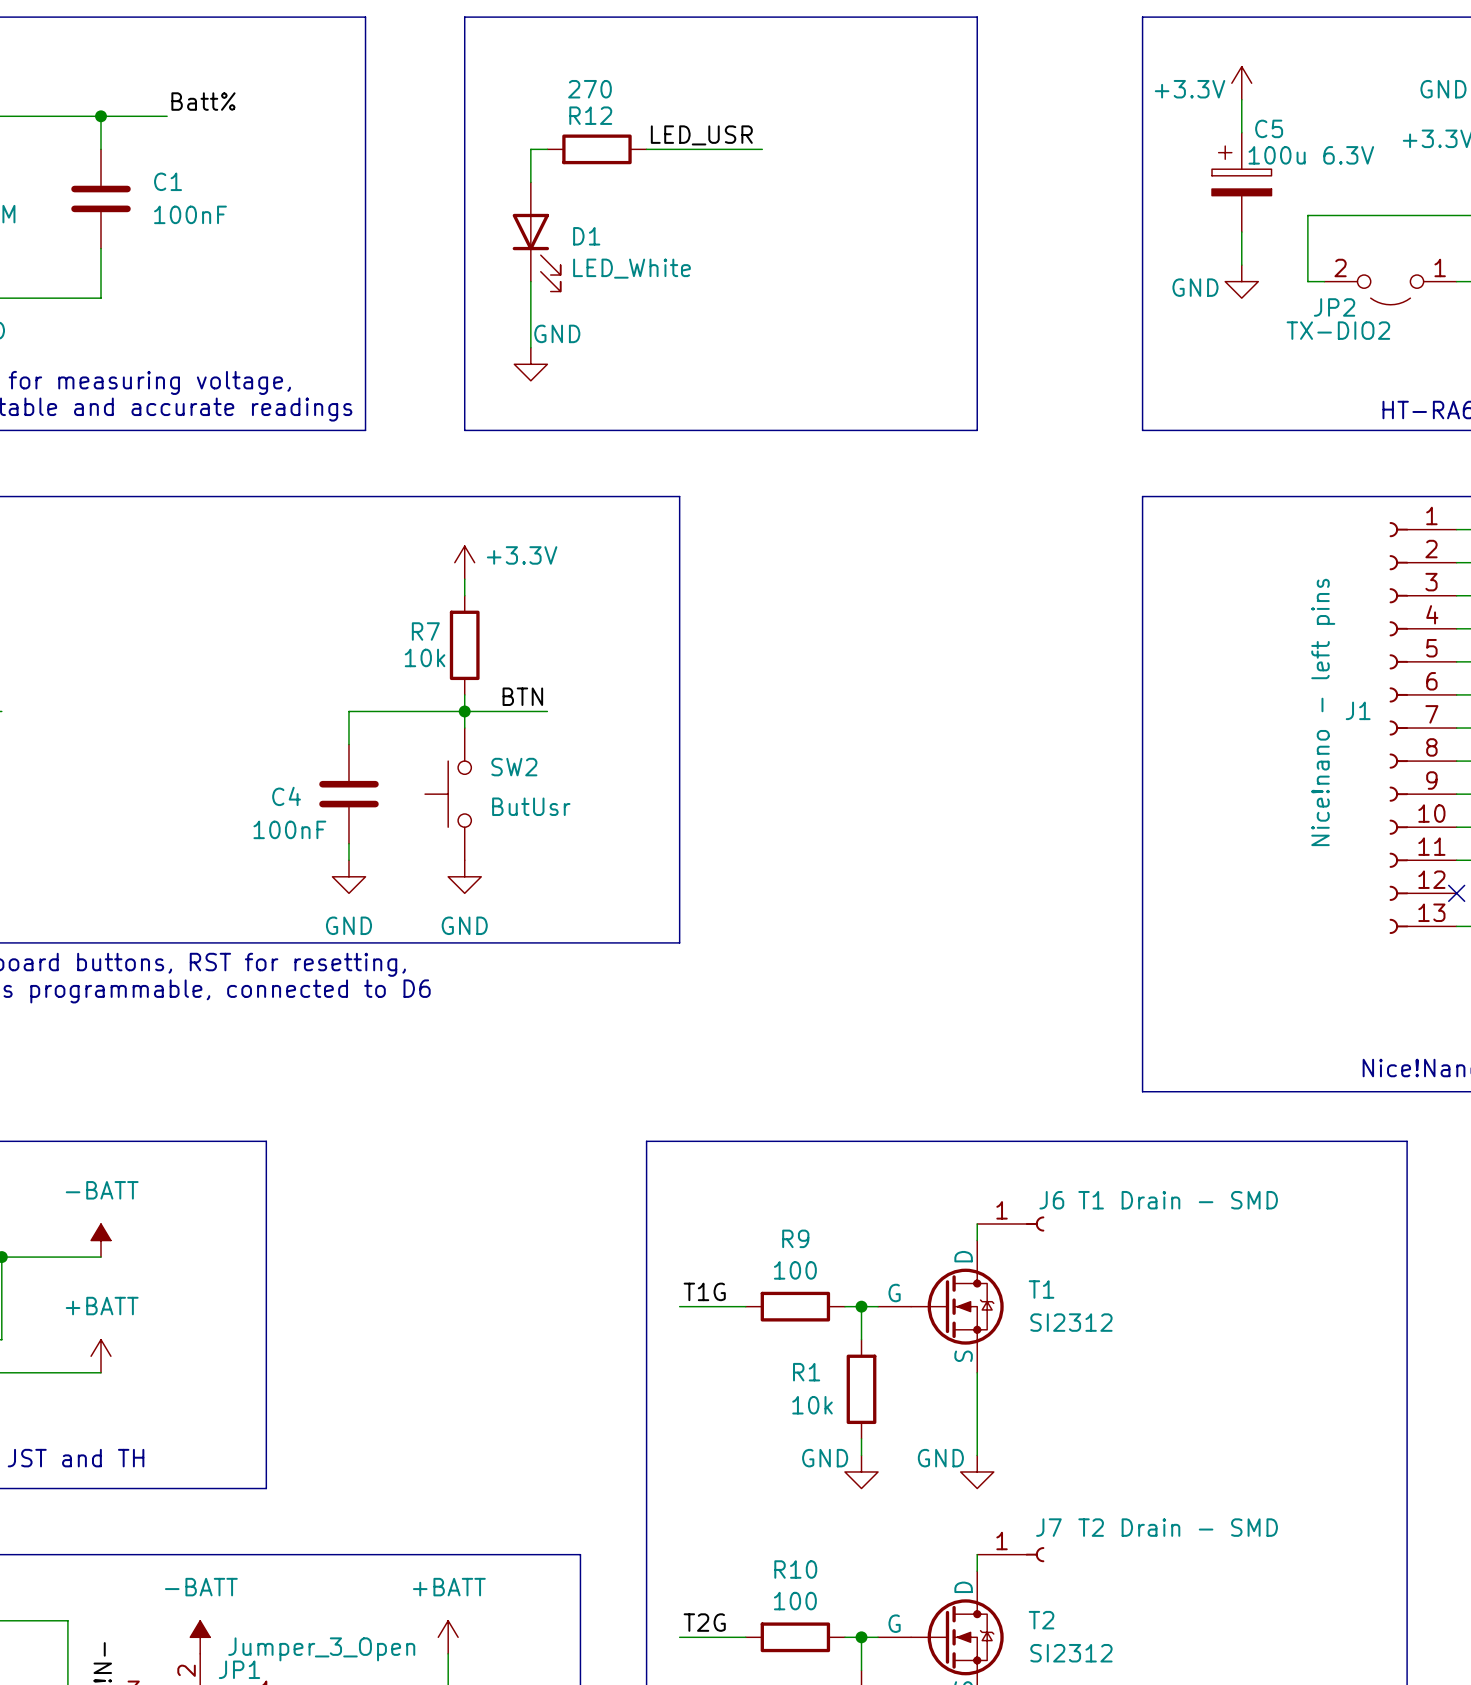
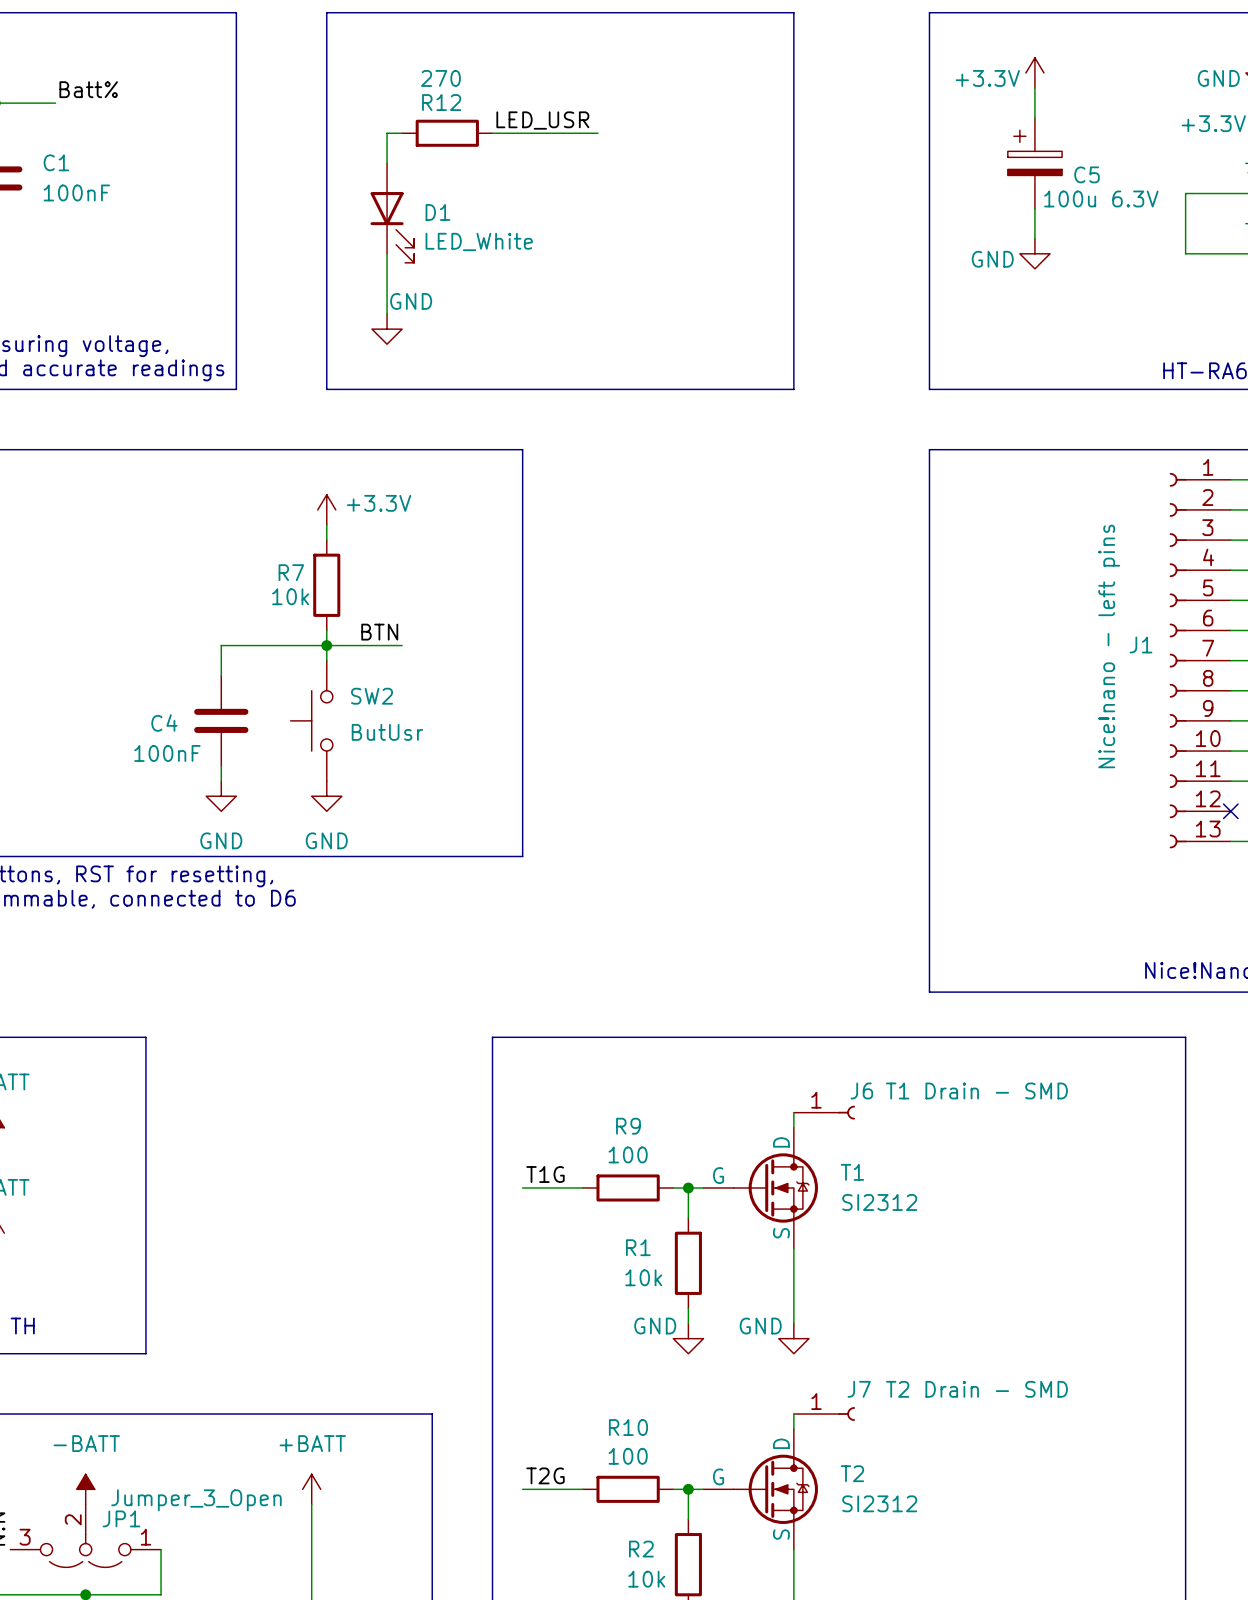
line: (1142, 17) (1142, 430) -> (944, 12) (929, 12) (929, 389) (944, 389)
C5 name position: C5 (1269, 128) -> C5 (1087, 174)
C5 value position: 100u 6.3V (1311, 155) -> 100u 6.3V (1101, 198)
wire: (1407, 215) (1307, 215) (1307, 281) (1324, 281) -> (1185, 193) (1185, 253) (1230, 253)
JP2: TX-DIO2 (1390, 289) -> none
line: (1142, 496) (1142, 1091) -> (944, 449) (929, 449) (929, 992) (944, 992)

